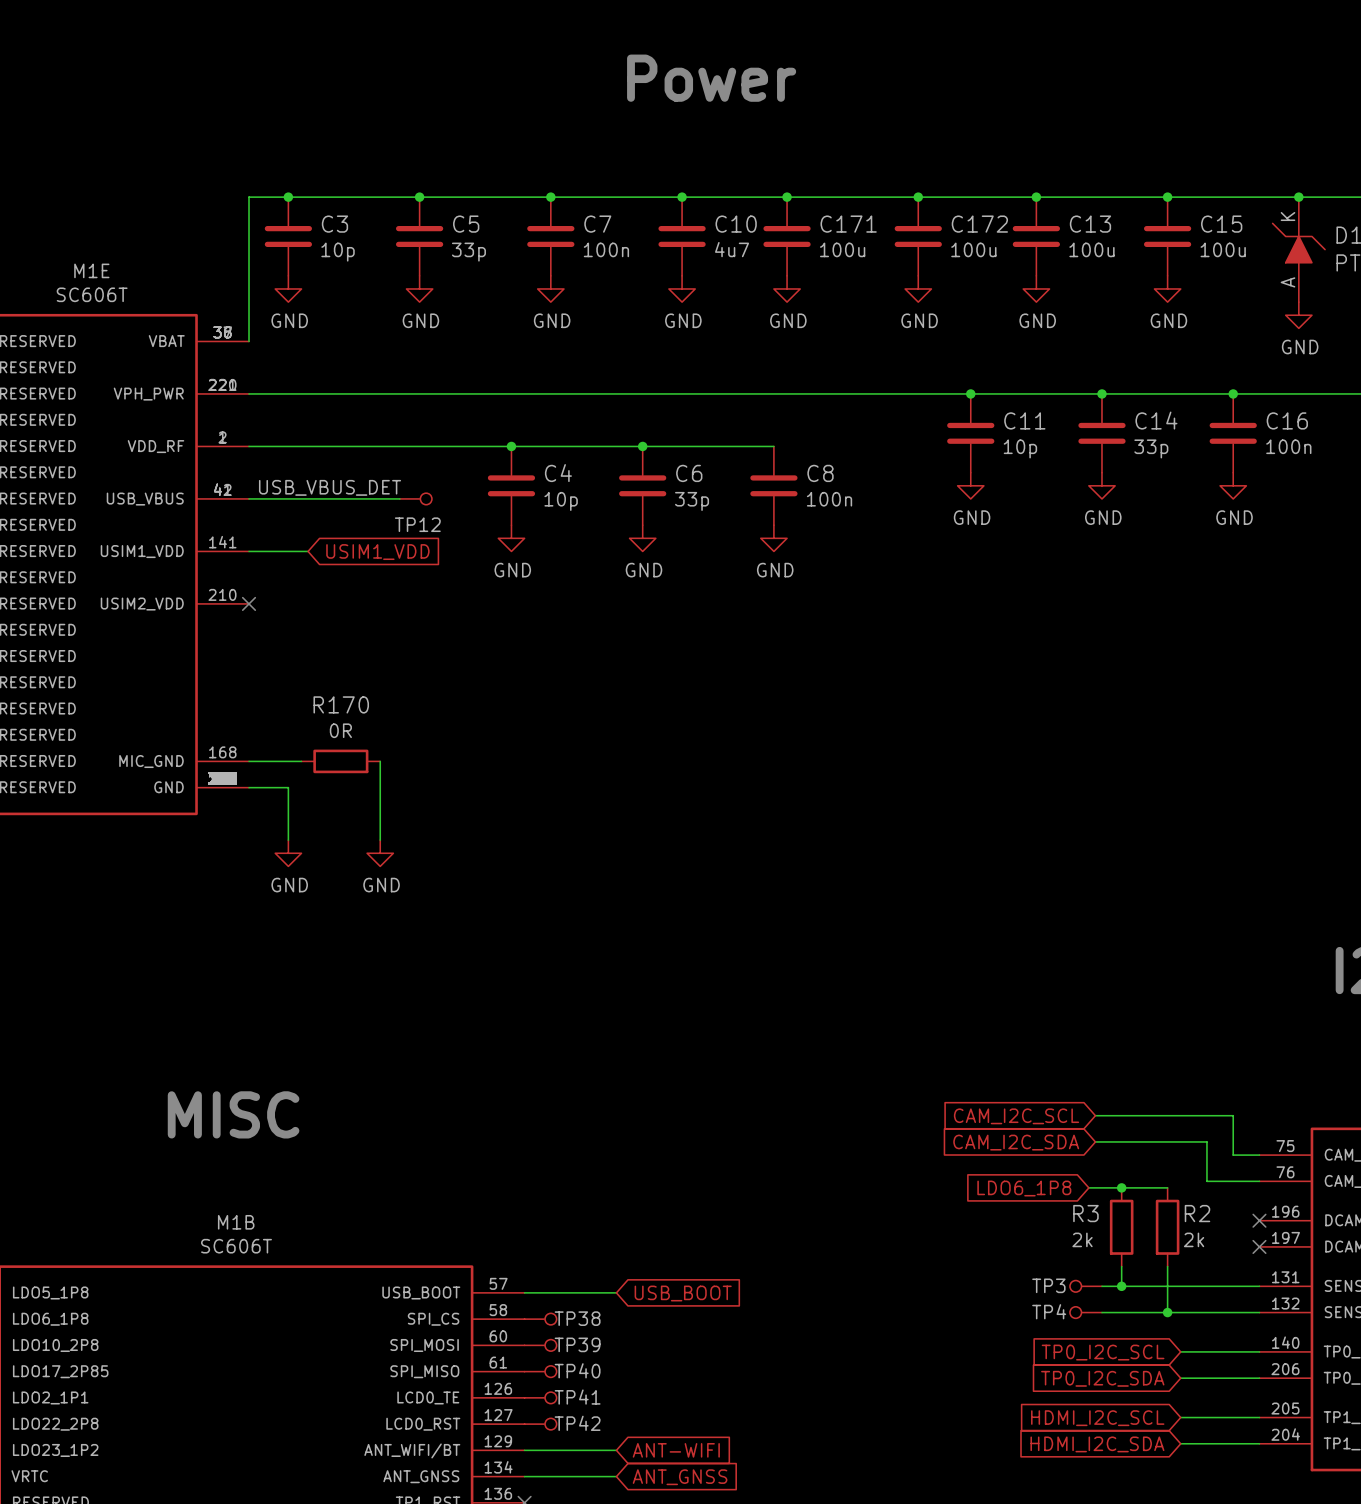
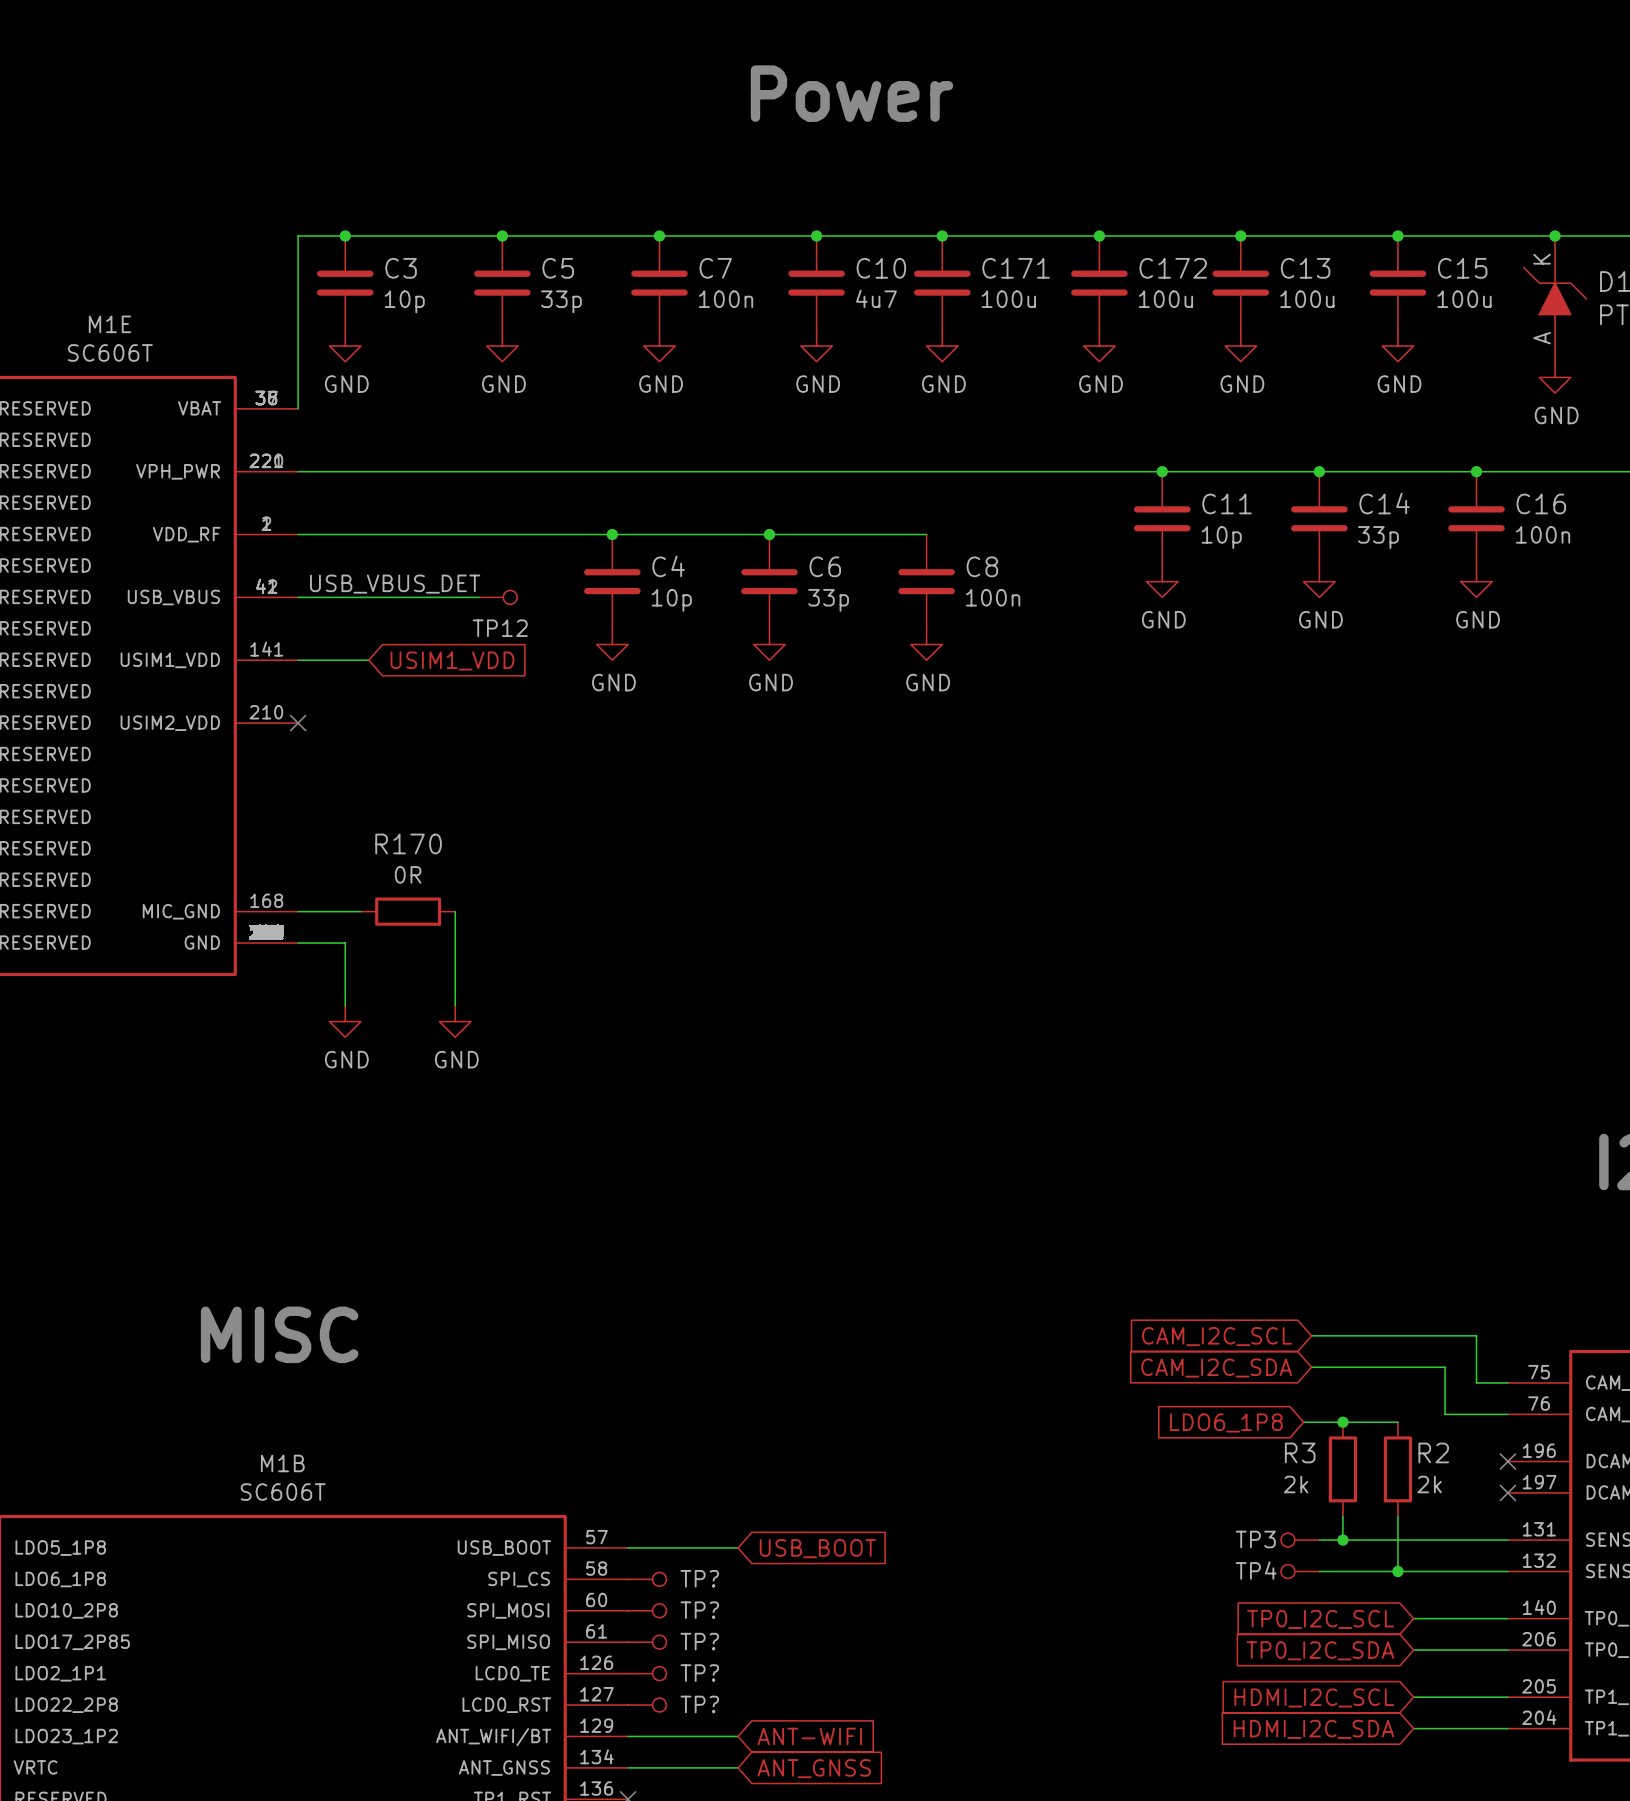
TP38 name: TP38 (577, 1318) -> TP? (699, 1578)
TP39 name: TP39 (577, 1344) -> TP? (699, 1610)
TP40 name: TP40 (577, 1370) -> TP? (699, 1641)
TP41 name: TP41 (577, 1397) -> TP? (699, 1673)
TP42 name: TP42 (577, 1423) -> TP? (699, 1704)

